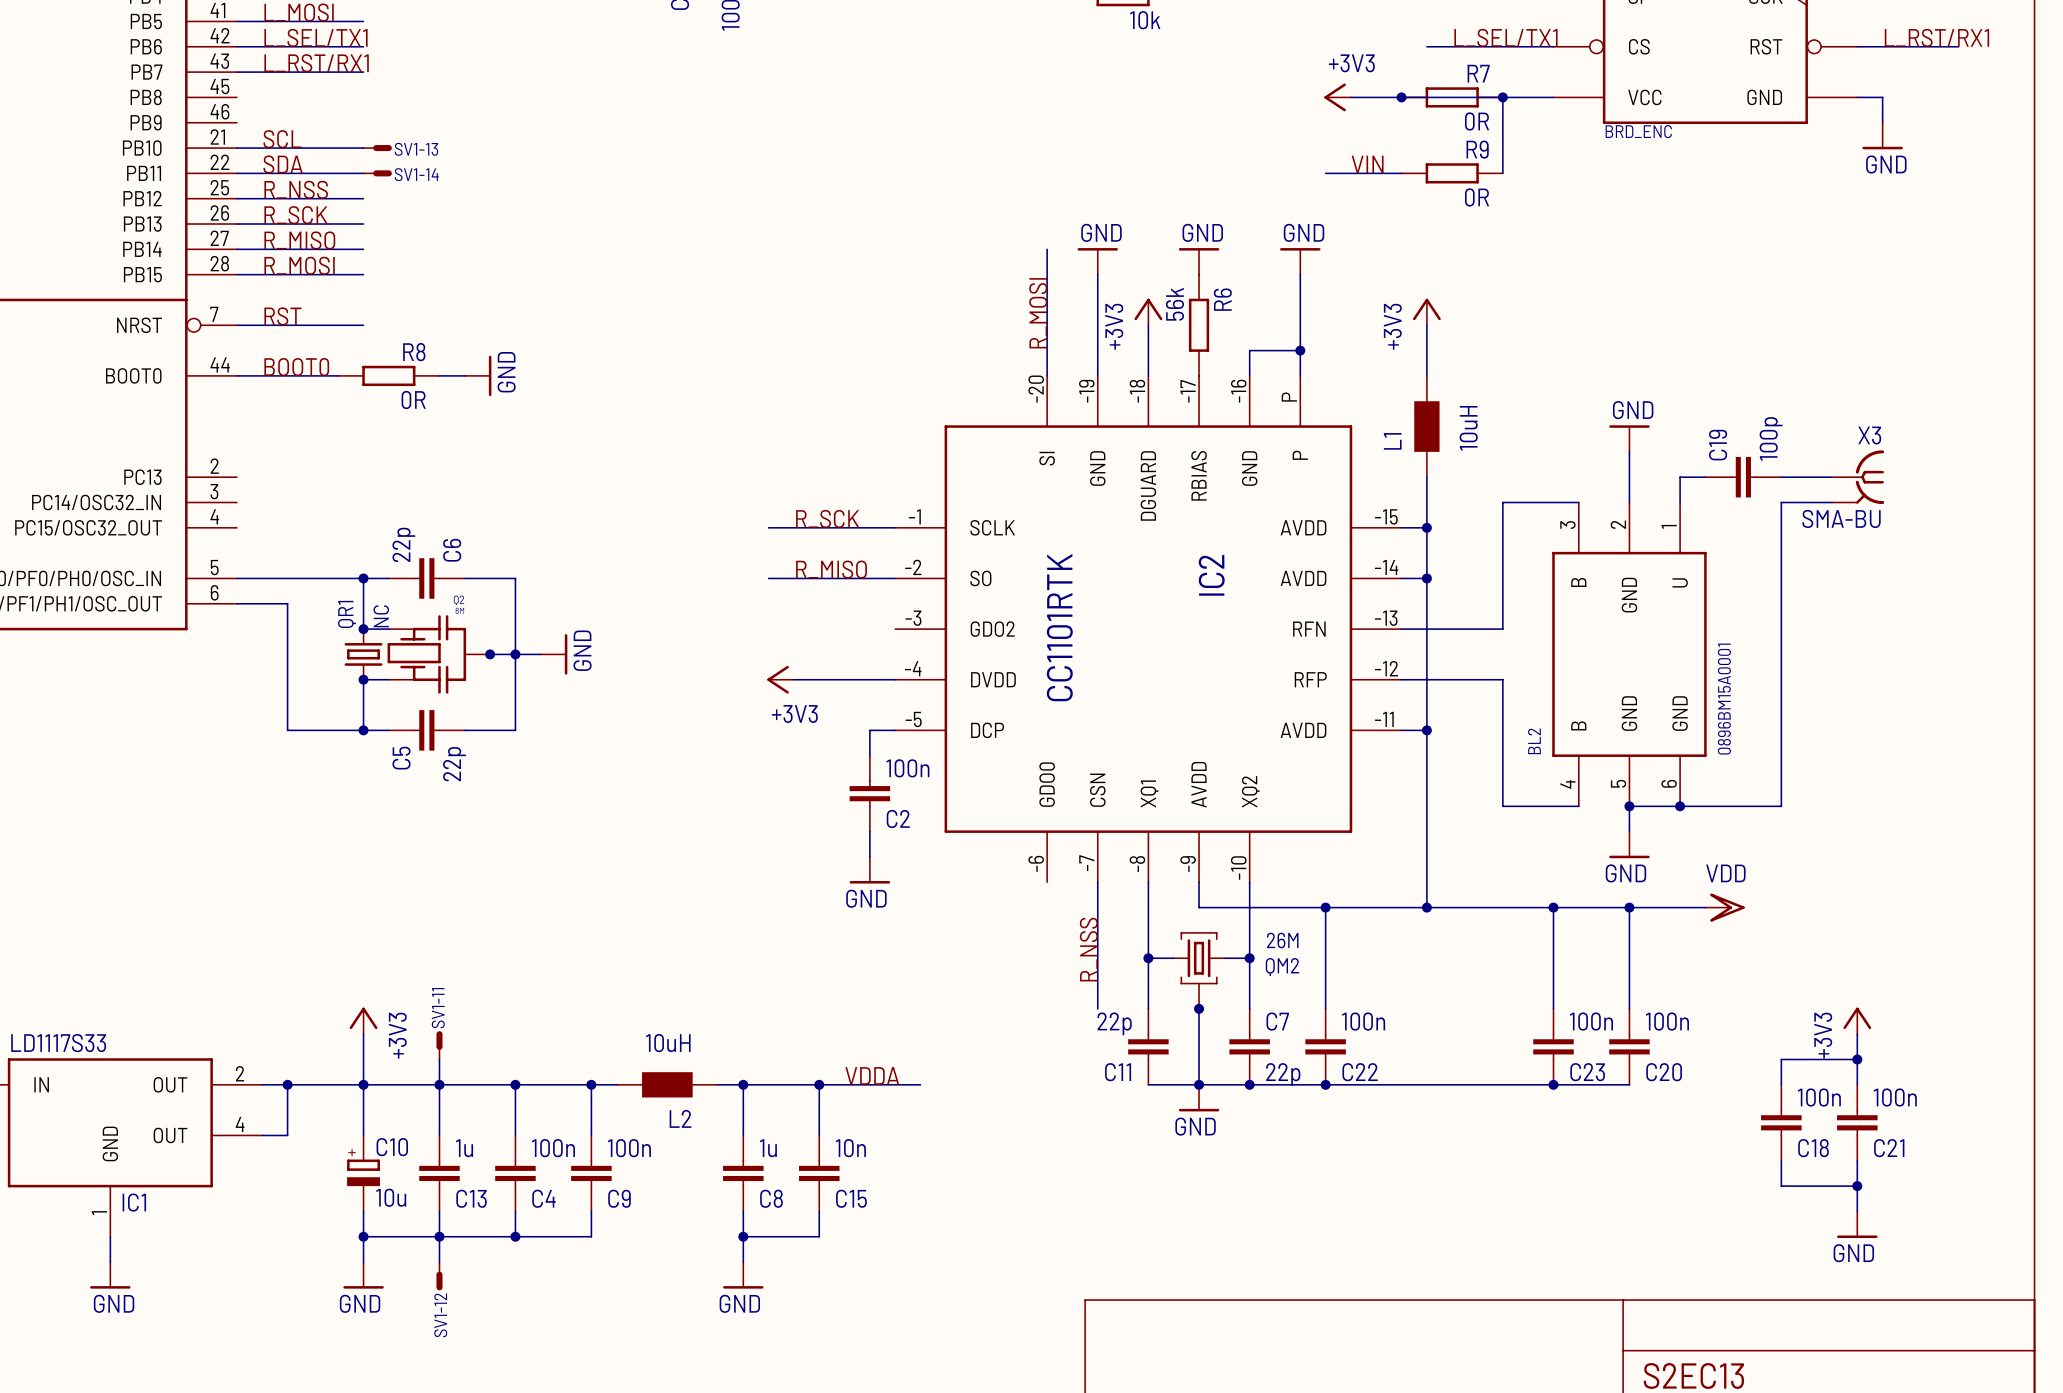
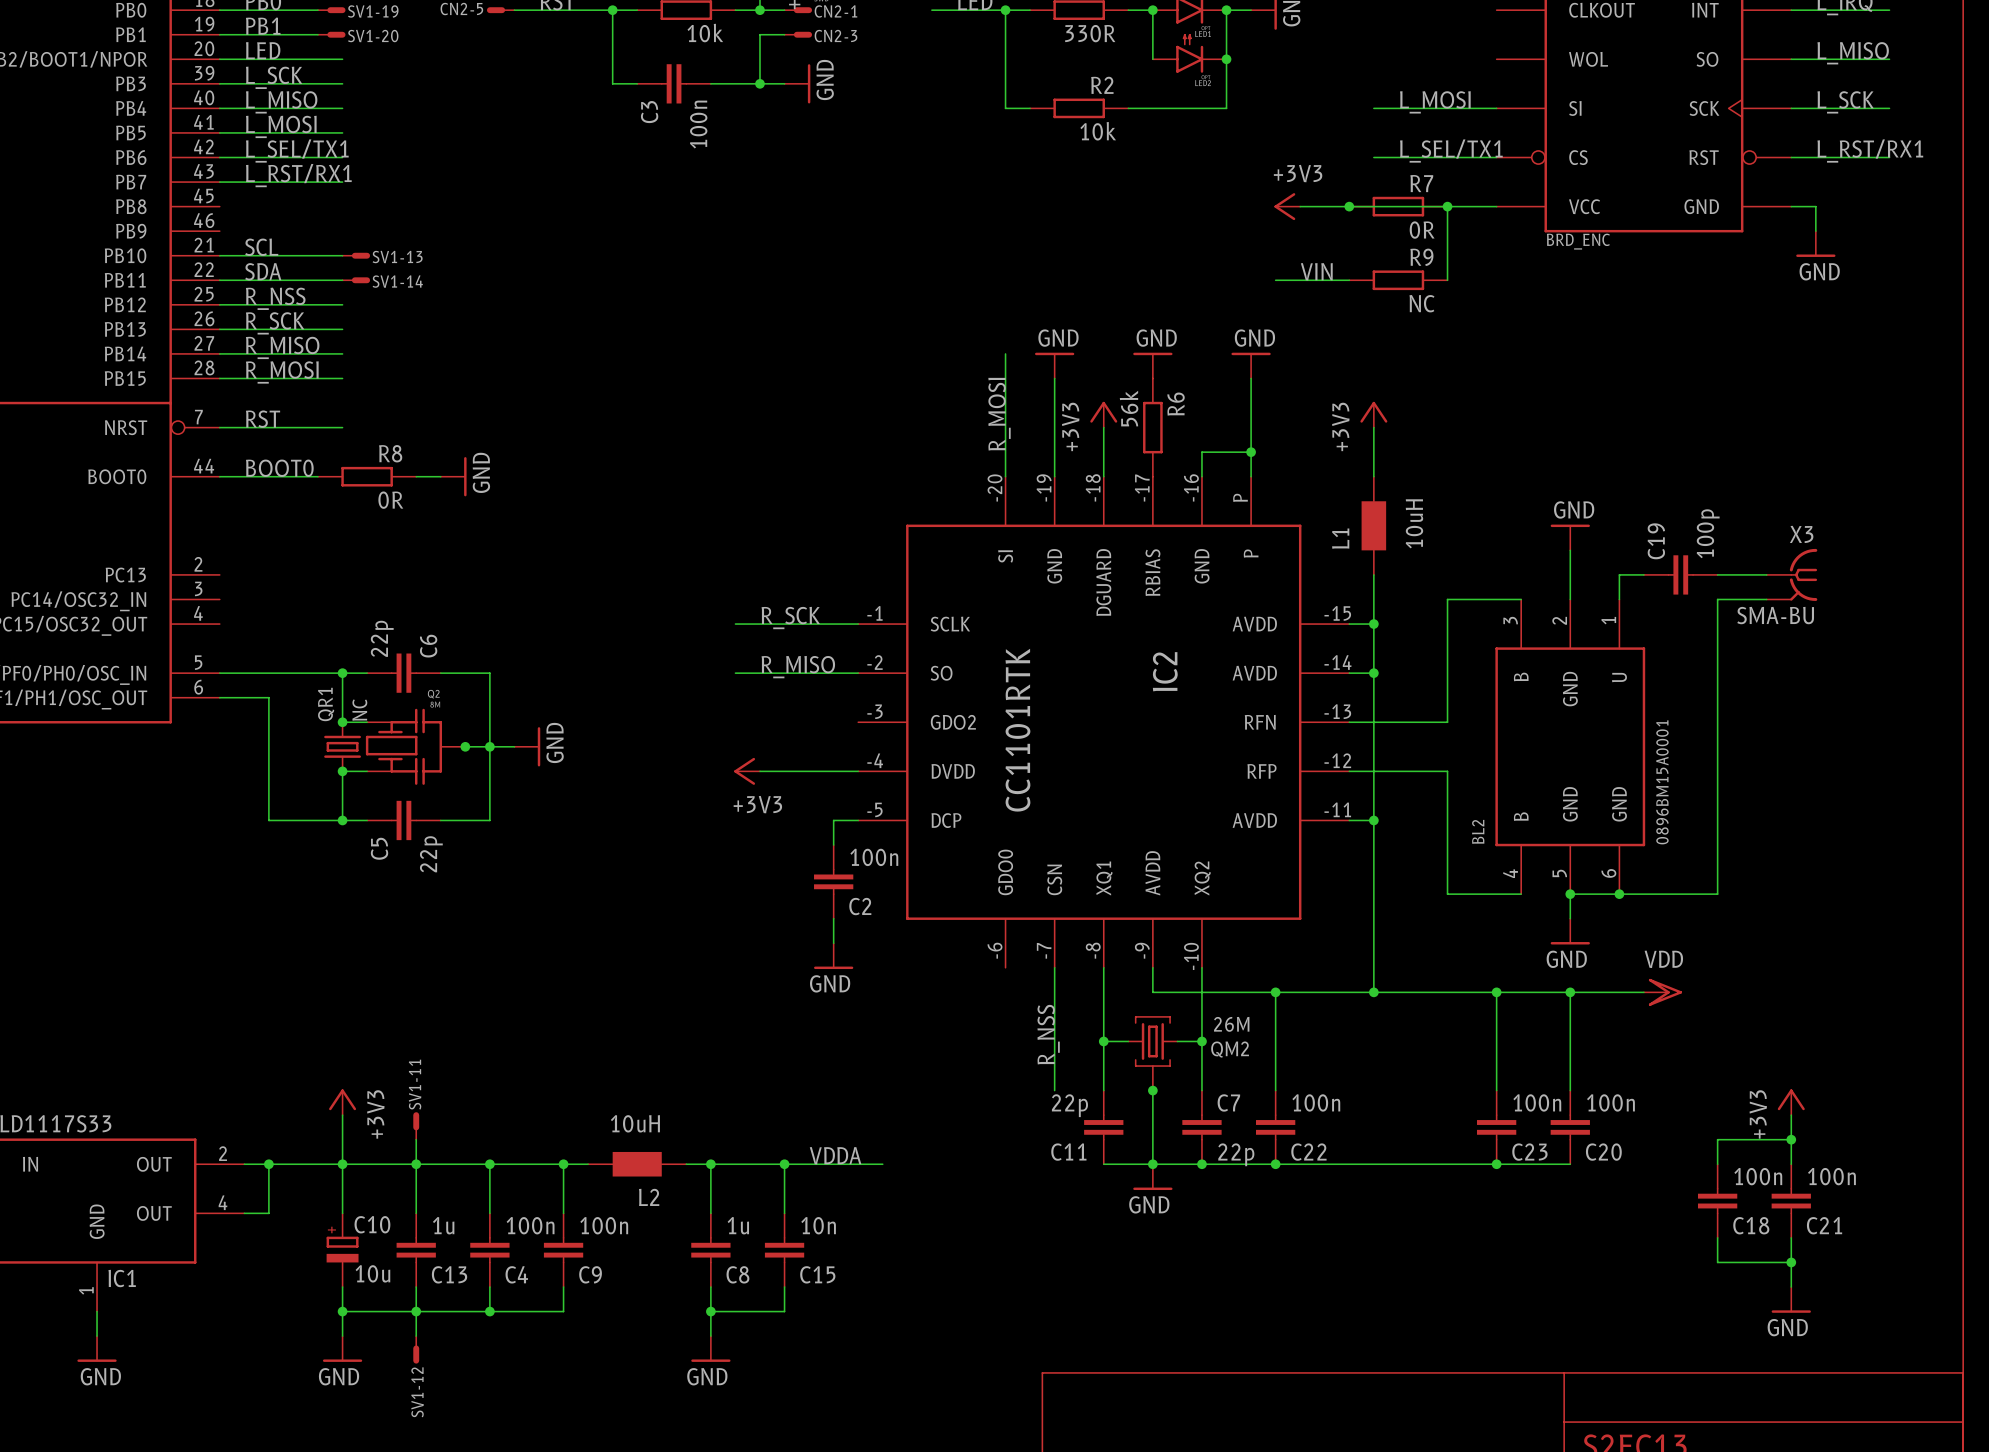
R9 value: 0R (1477, 197) -> NC (1421, 303)

